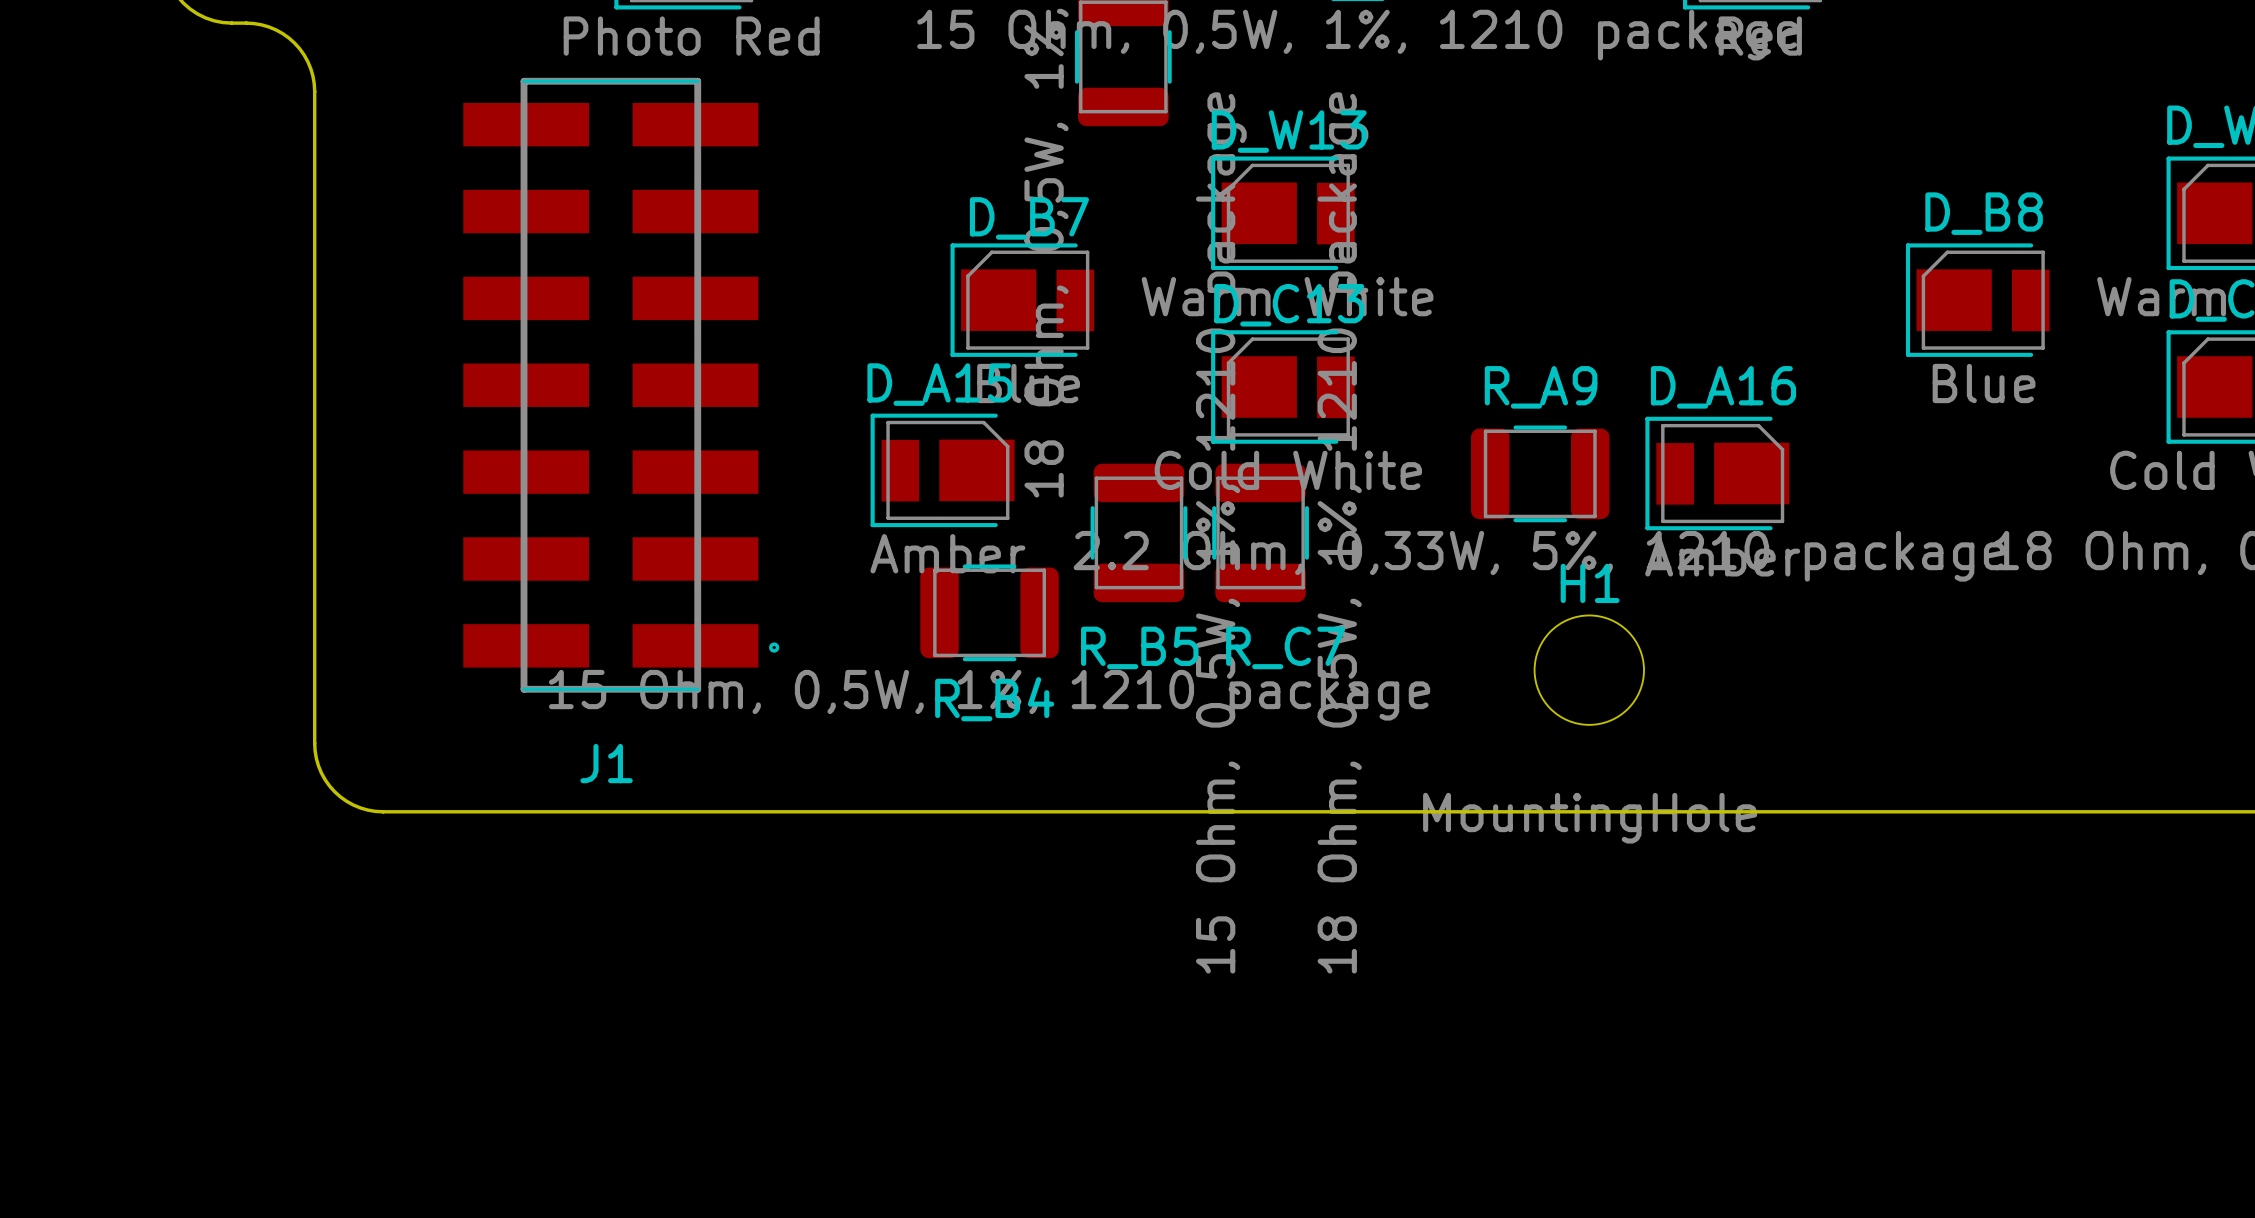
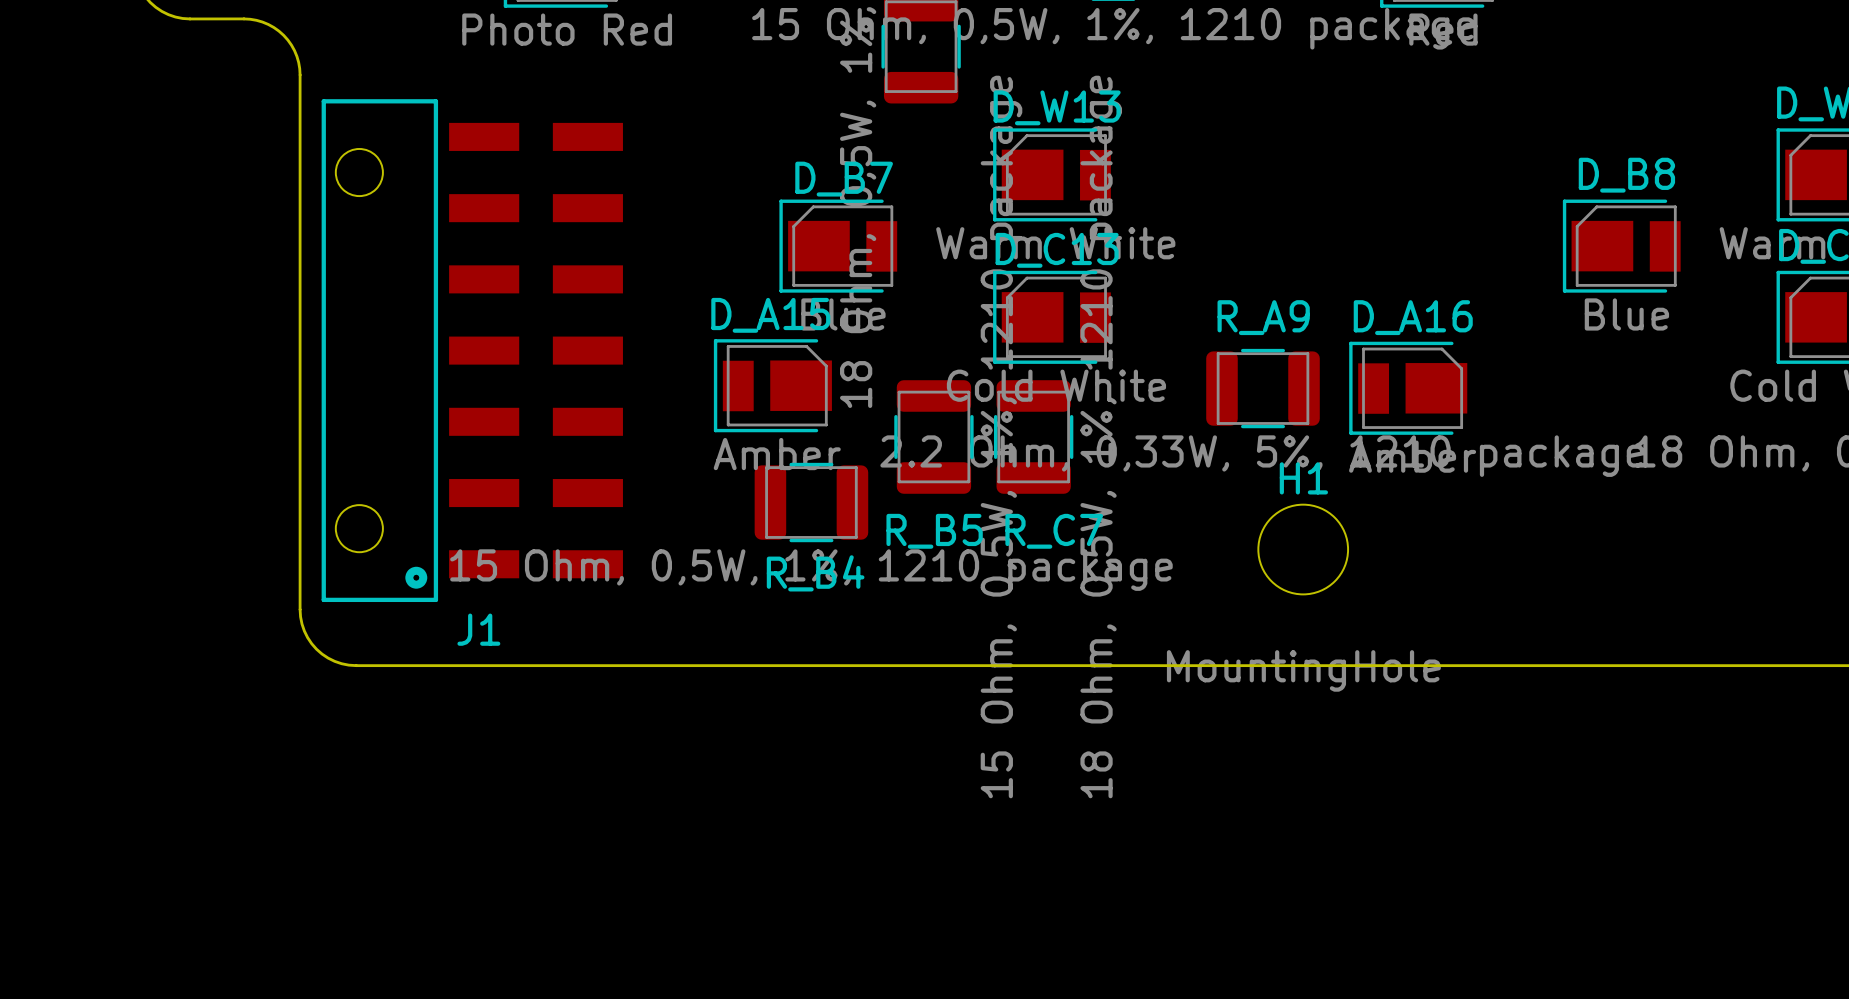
board edge: (231, 23) (261, 24) (275, 29) (288, 38) (304, 55) (310, 68) (314, 83) (314, 743) (316, 758) (321, 773) (329, 786) (340, 796) (353, 805) (375, 811) (434, 811) -> (190, 18) (244, 18) (262, 22) (273, 27) (287, 40) (298, 62) (300, 616) (307, 637) (322, 654) (334, 661) (356, 665)
J1 footprint: [463, 77, 780, 693] -> [321, 99, 623, 603]

